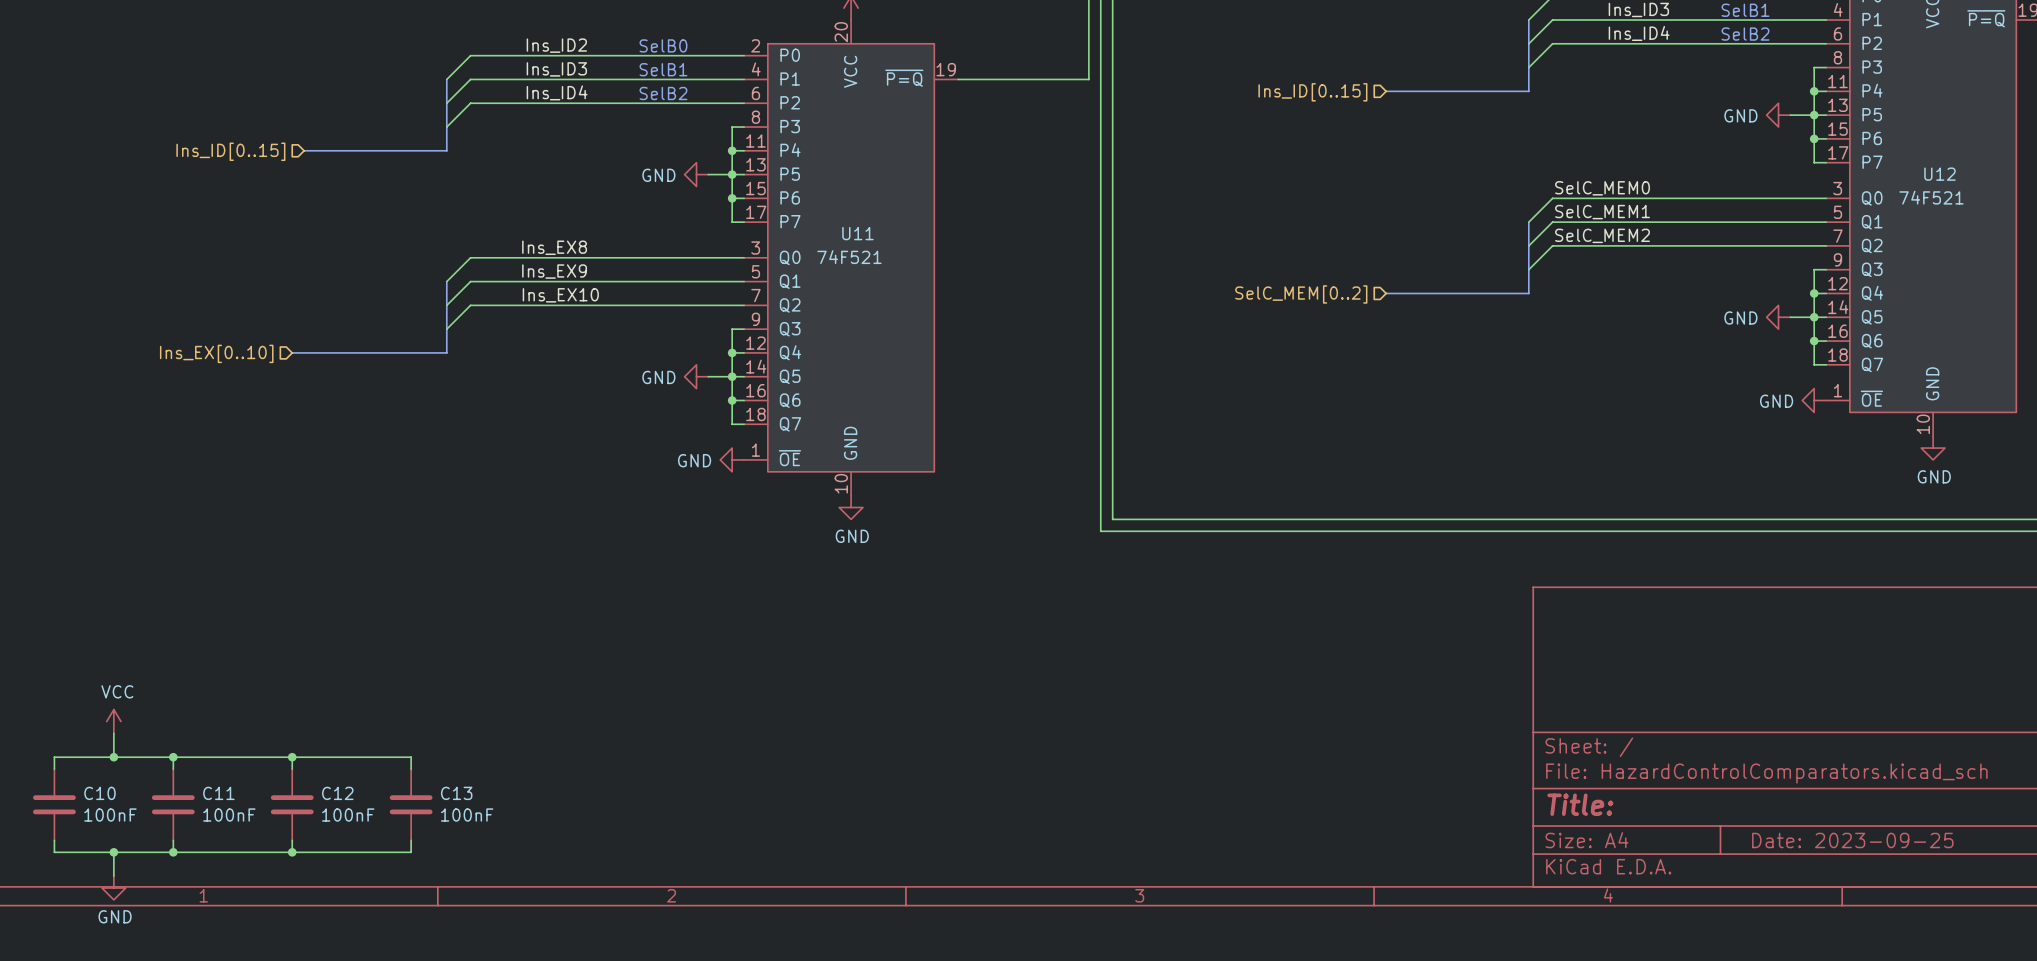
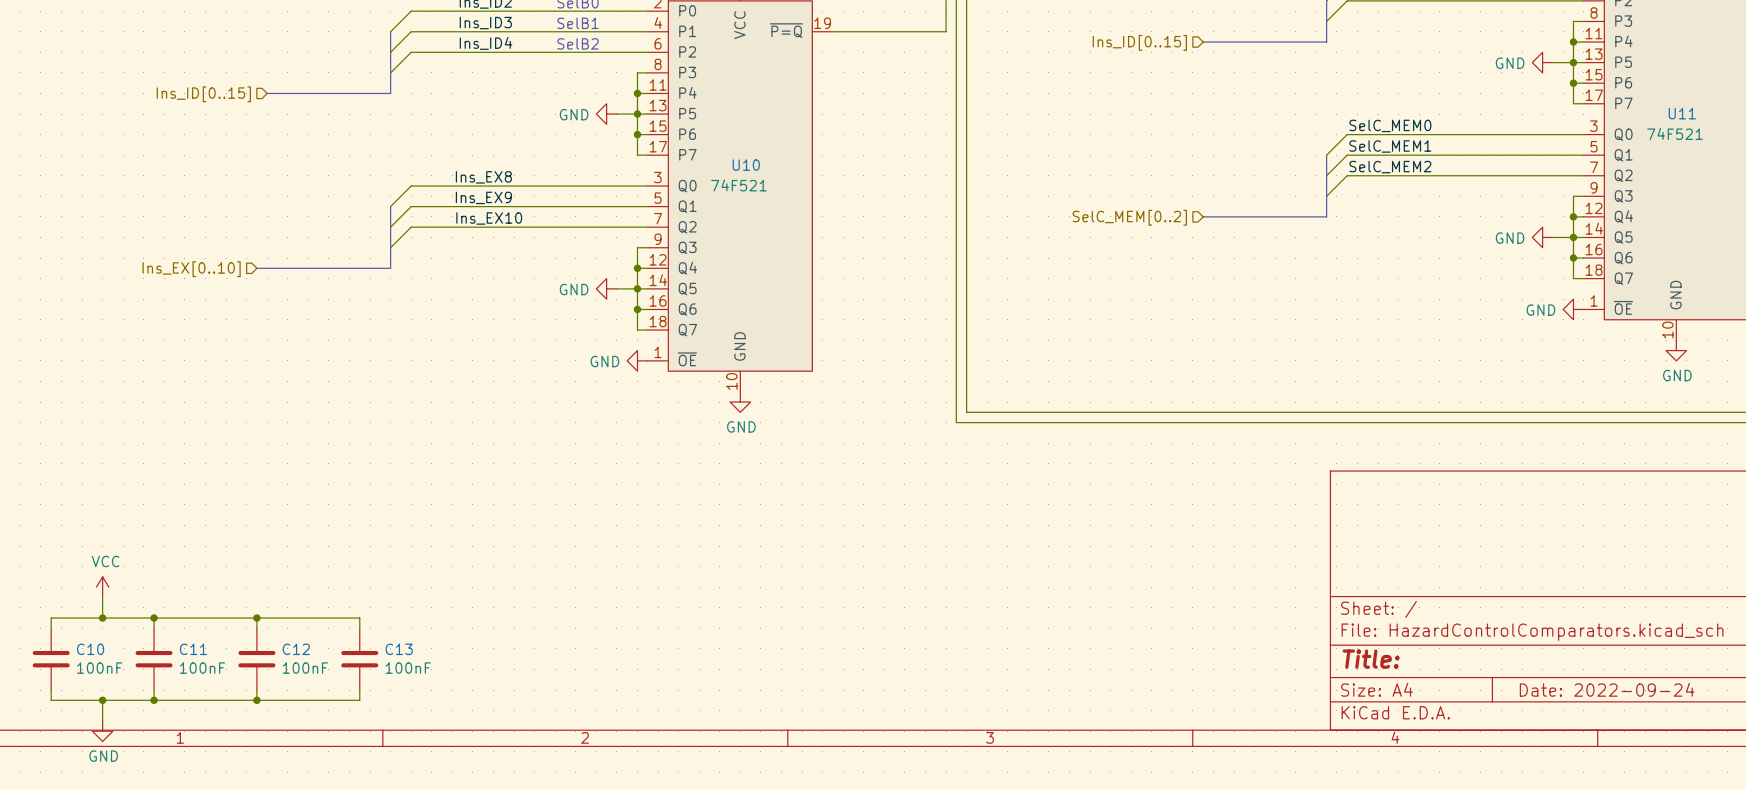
U12 name: U12 (1939, 174) -> U11 (1682, 113)
U11 name: U11 (857, 233) -> U10 (746, 165)
title block: Date: 2023-09-25 (1852, 840) -> Date: 2022-09-24 (1607, 689)

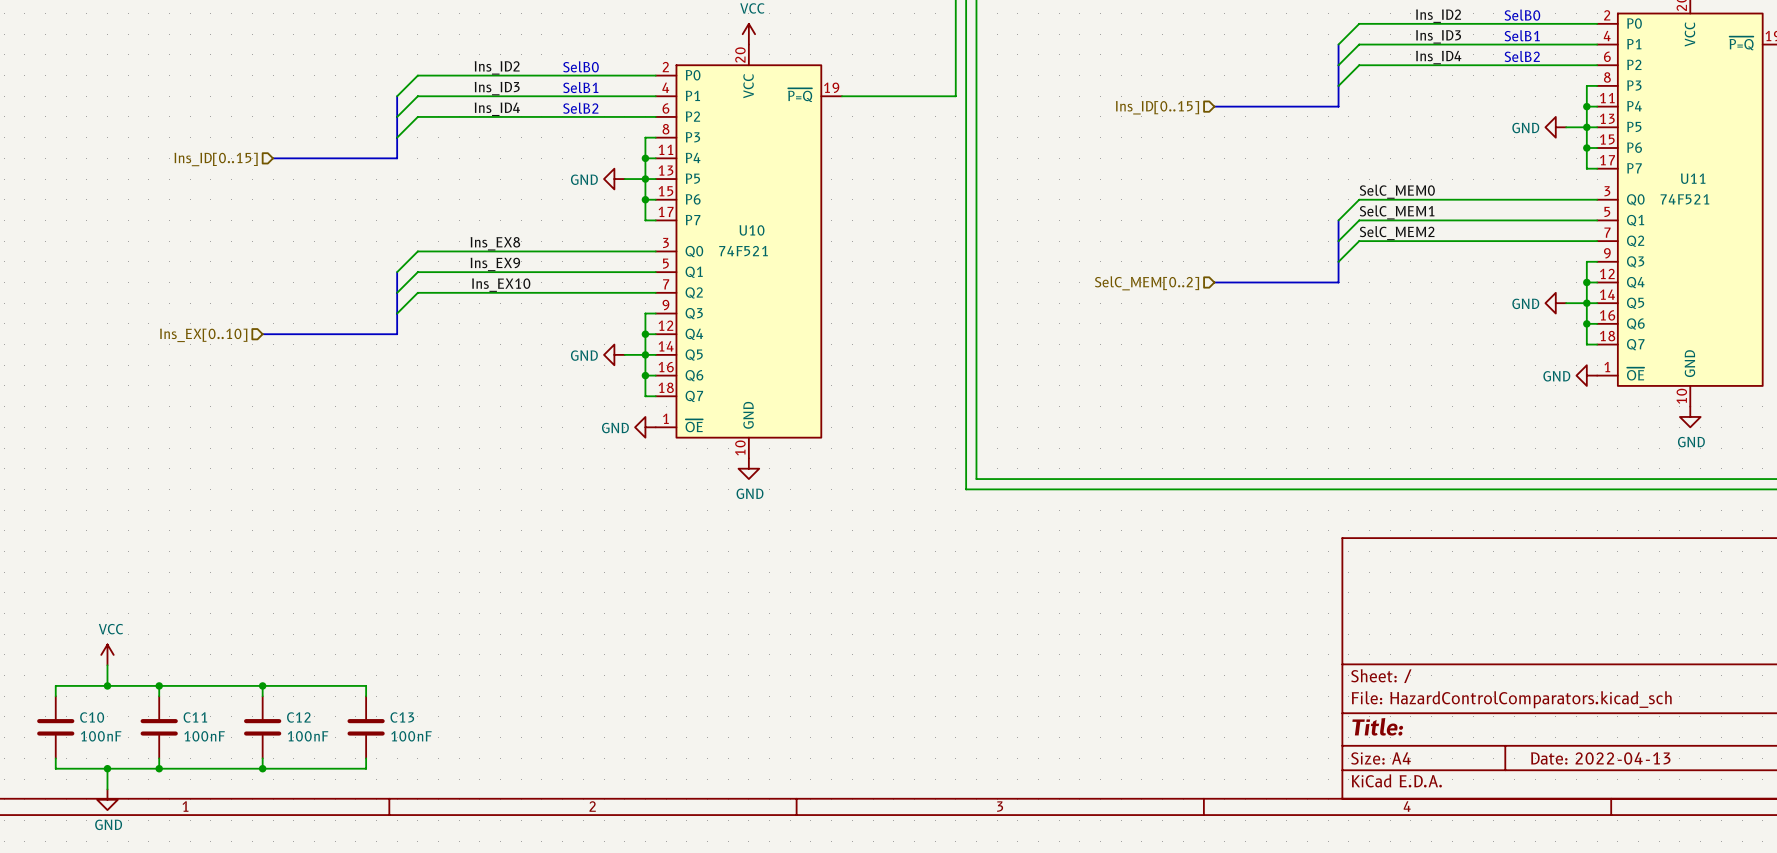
title block: Date: 2022-09-24 (1607, 689) -> Date: 2022-04-13 (1600, 758)

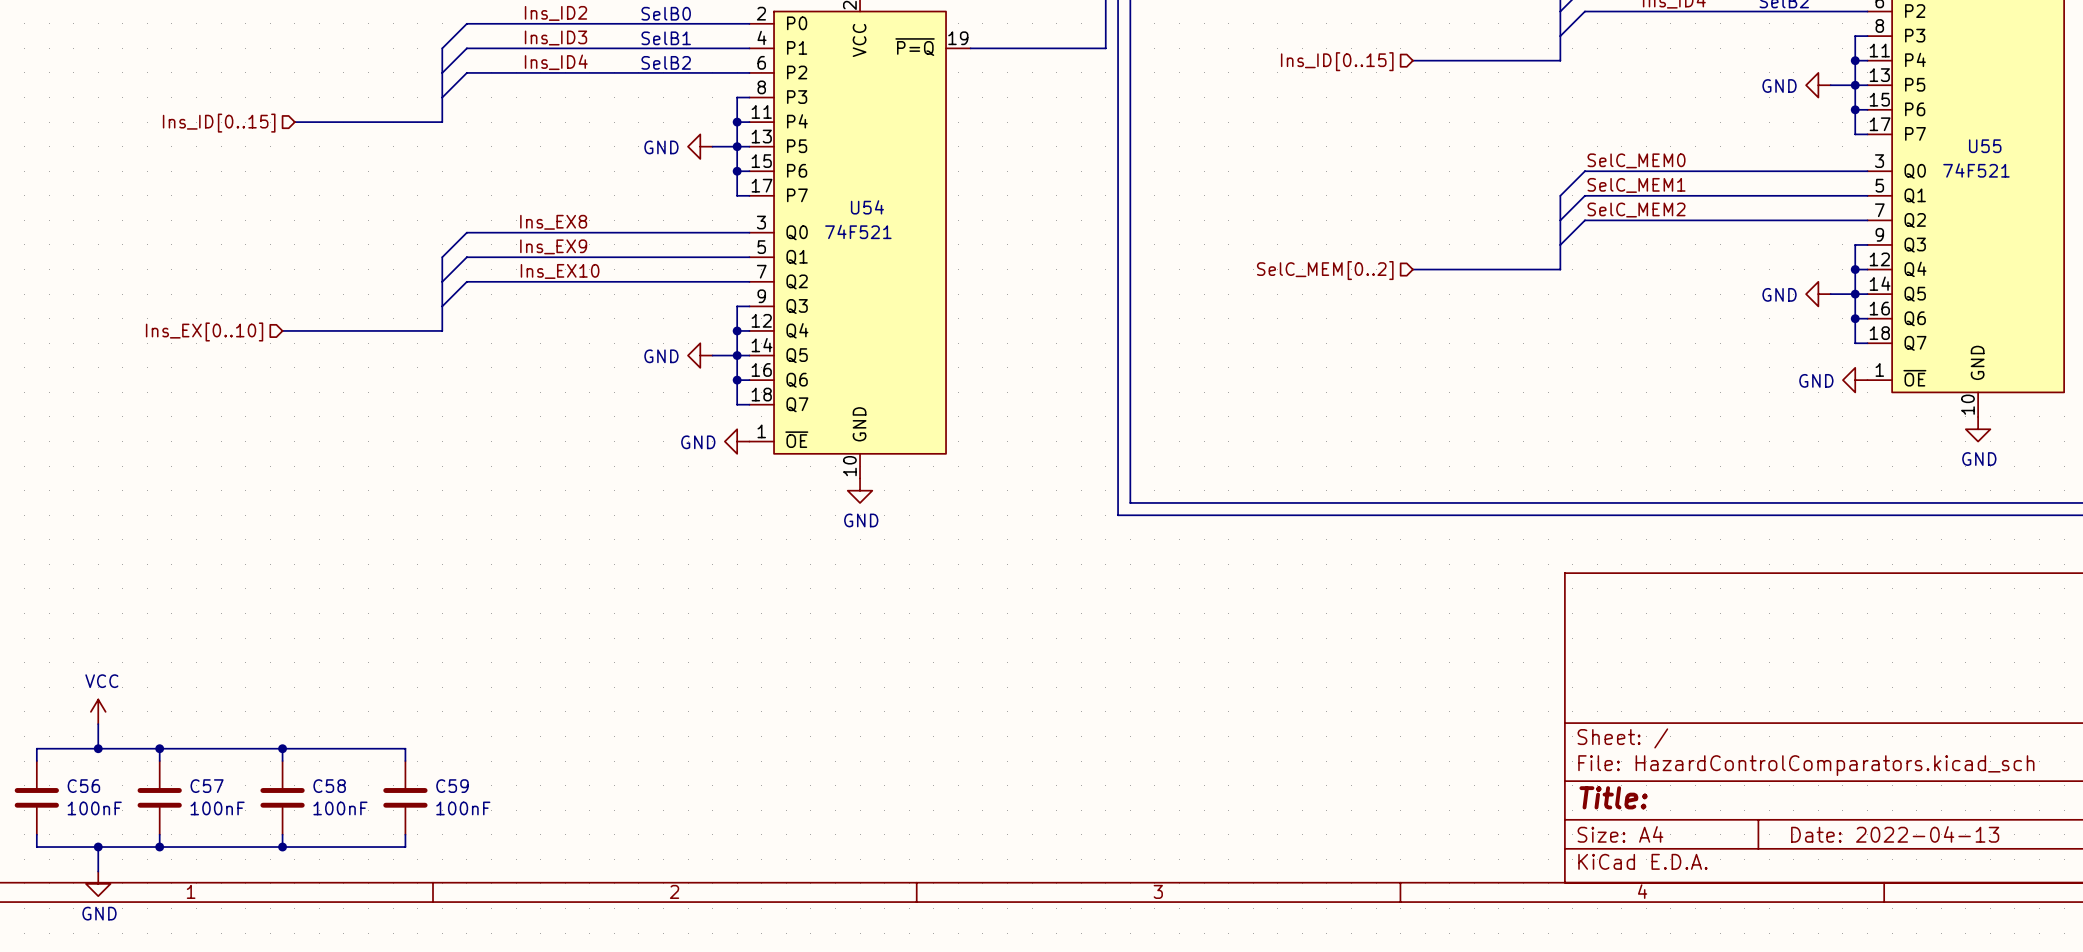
U11 name: U11 (1693, 178) -> U55 (1985, 146)
U10 name: U10 (752, 230) -> U54 (867, 207)
C10 name: C10 (92, 717) -> C56 (83, 786)
C11 name: C11 (195, 717) -> C57 (207, 786)
C12 name: C12 (298, 717) -> C58 (329, 786)
C13 name: C13 (402, 717) -> C59 (452, 786)

